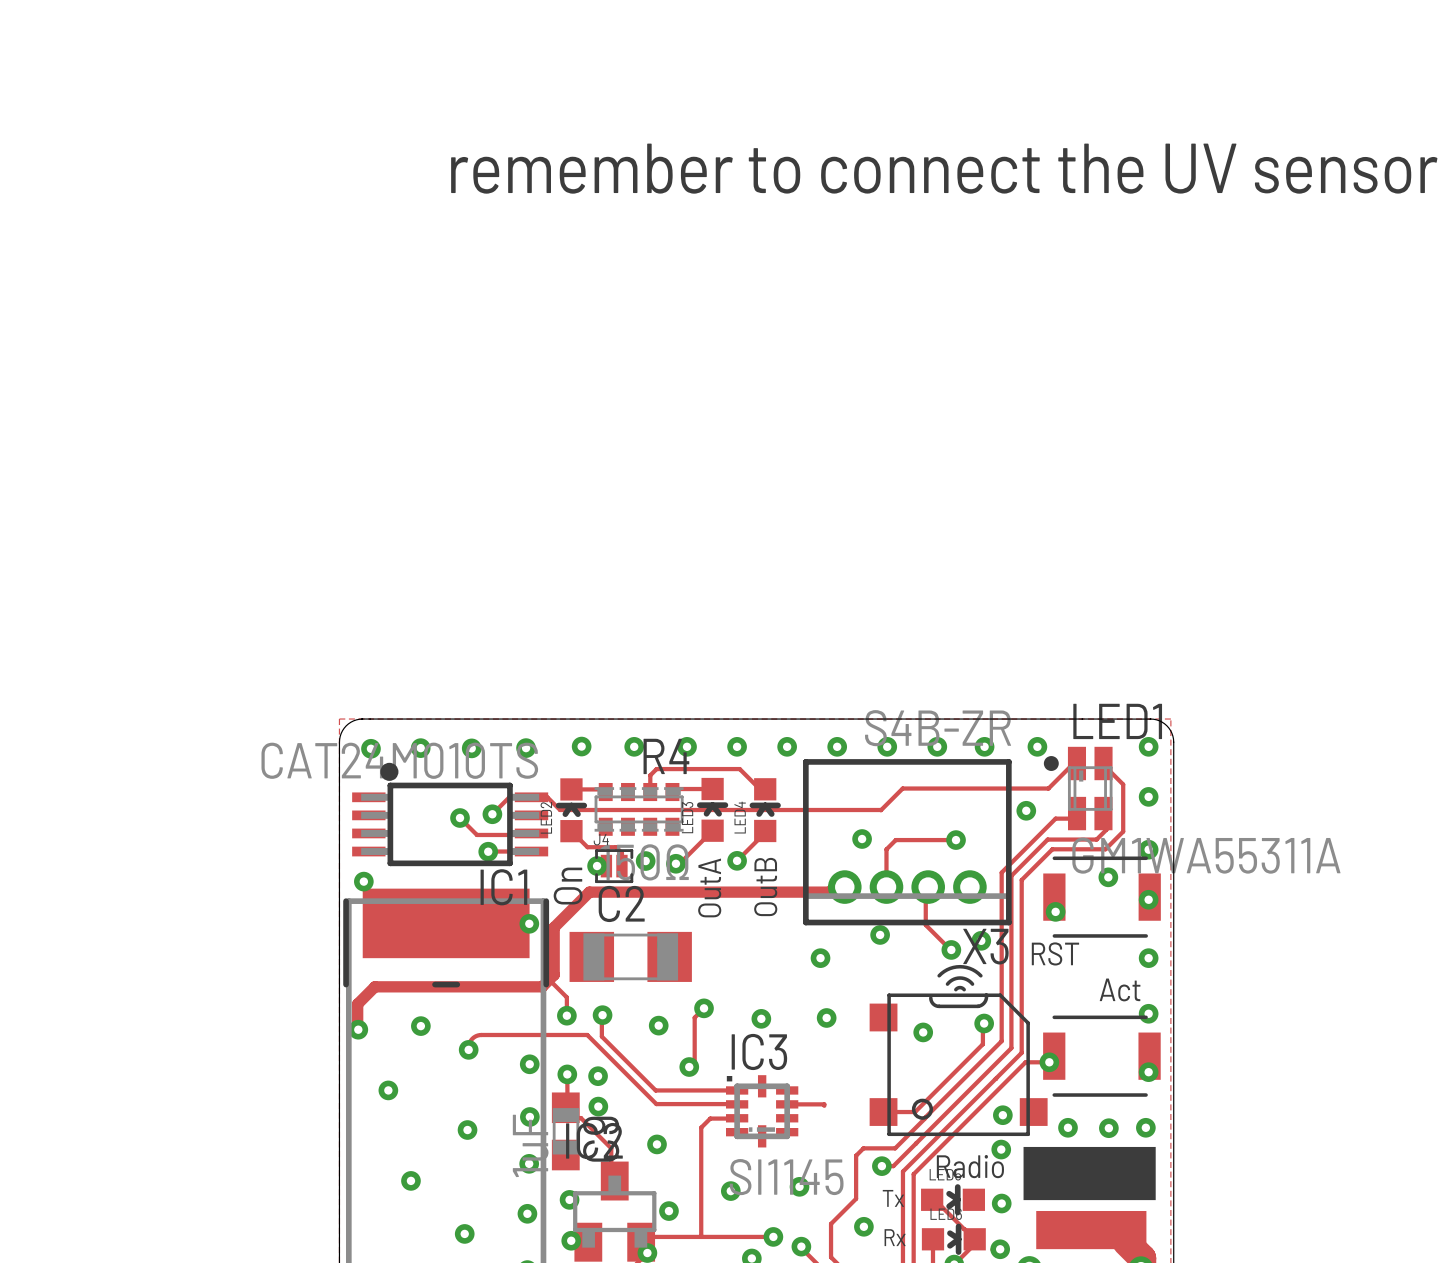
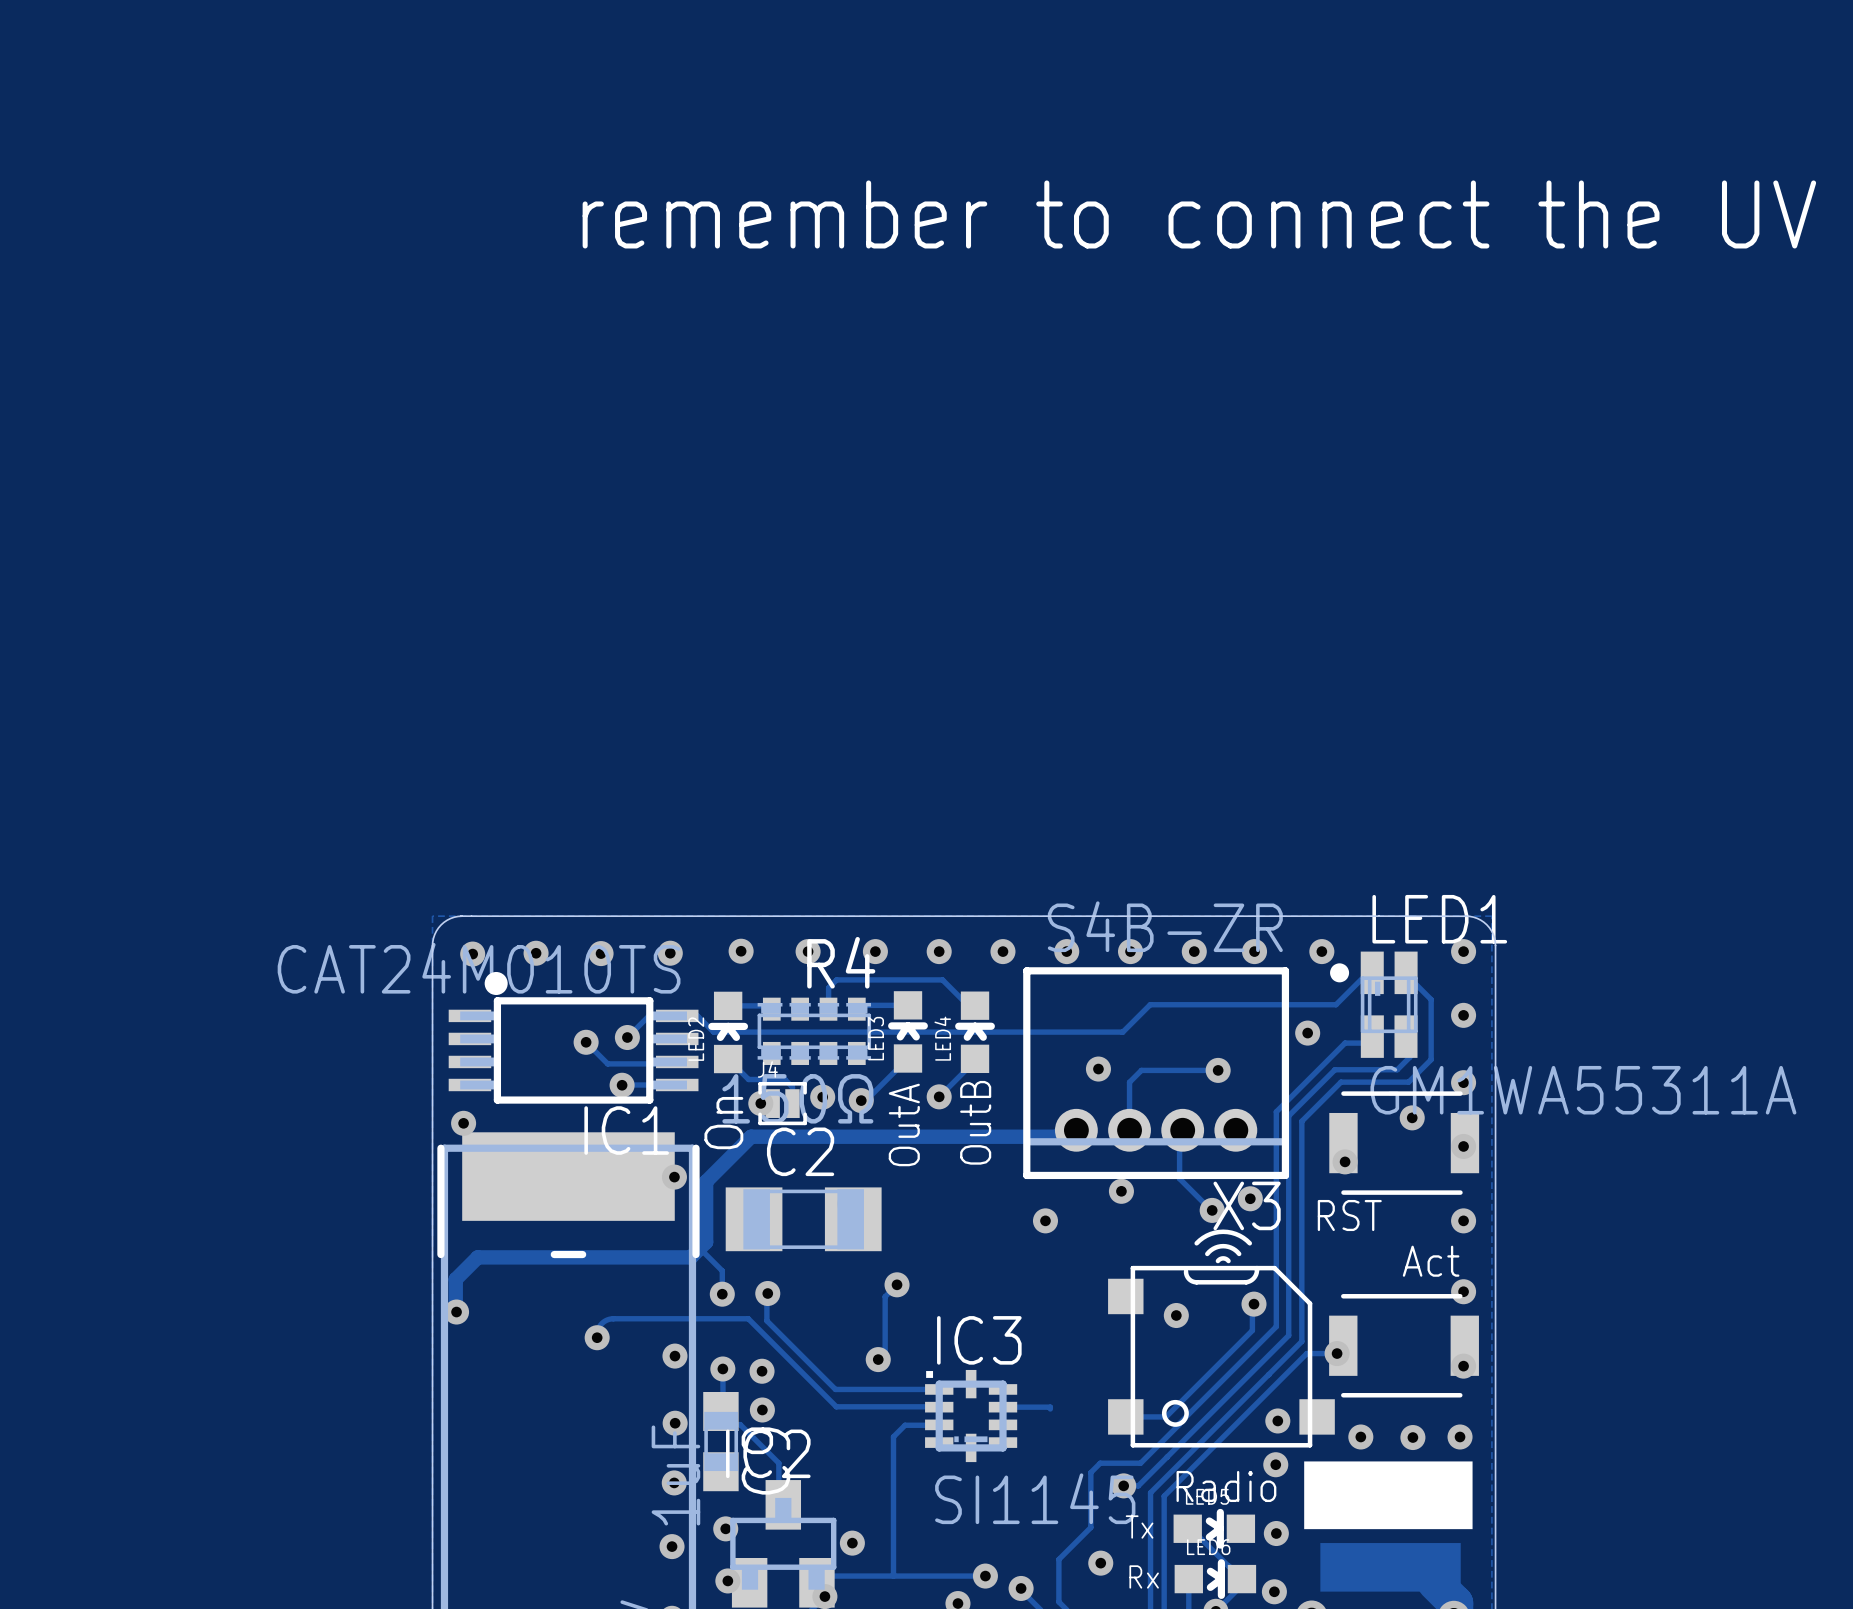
via: (826, 1017) -> none
via: (761, 1018) -> none
via: (658, 1025) -> none
via: (420, 1026) -> none
via: (388, 1090) -> none
via: (467, 1130) -> none
via: (657, 1144) -> none
via: (410, 1180) -> none
via: (799, 1186) -> none
via: (730, 1191) -> none
via: (464, 1233) -> none

